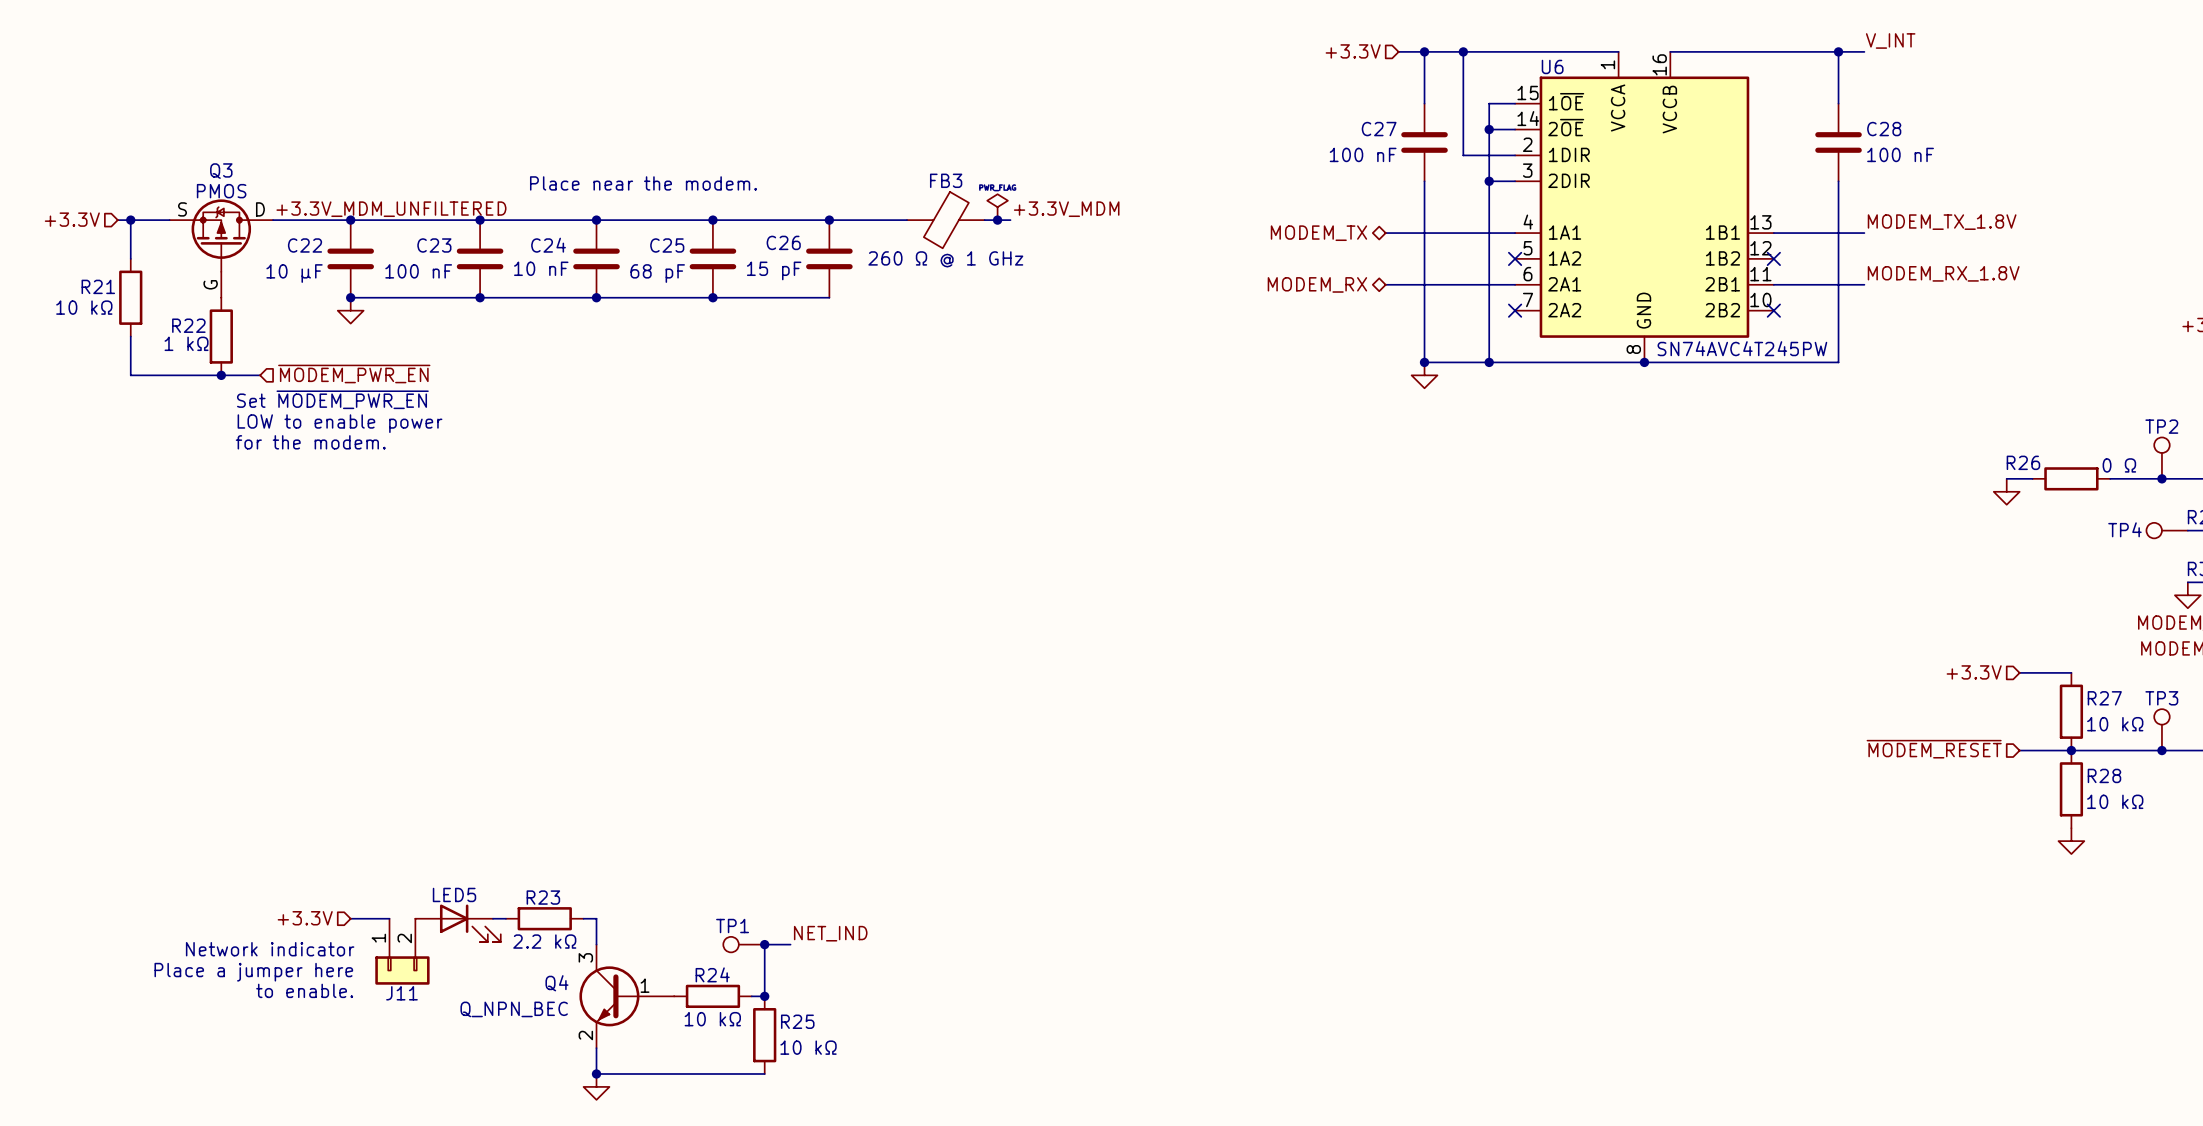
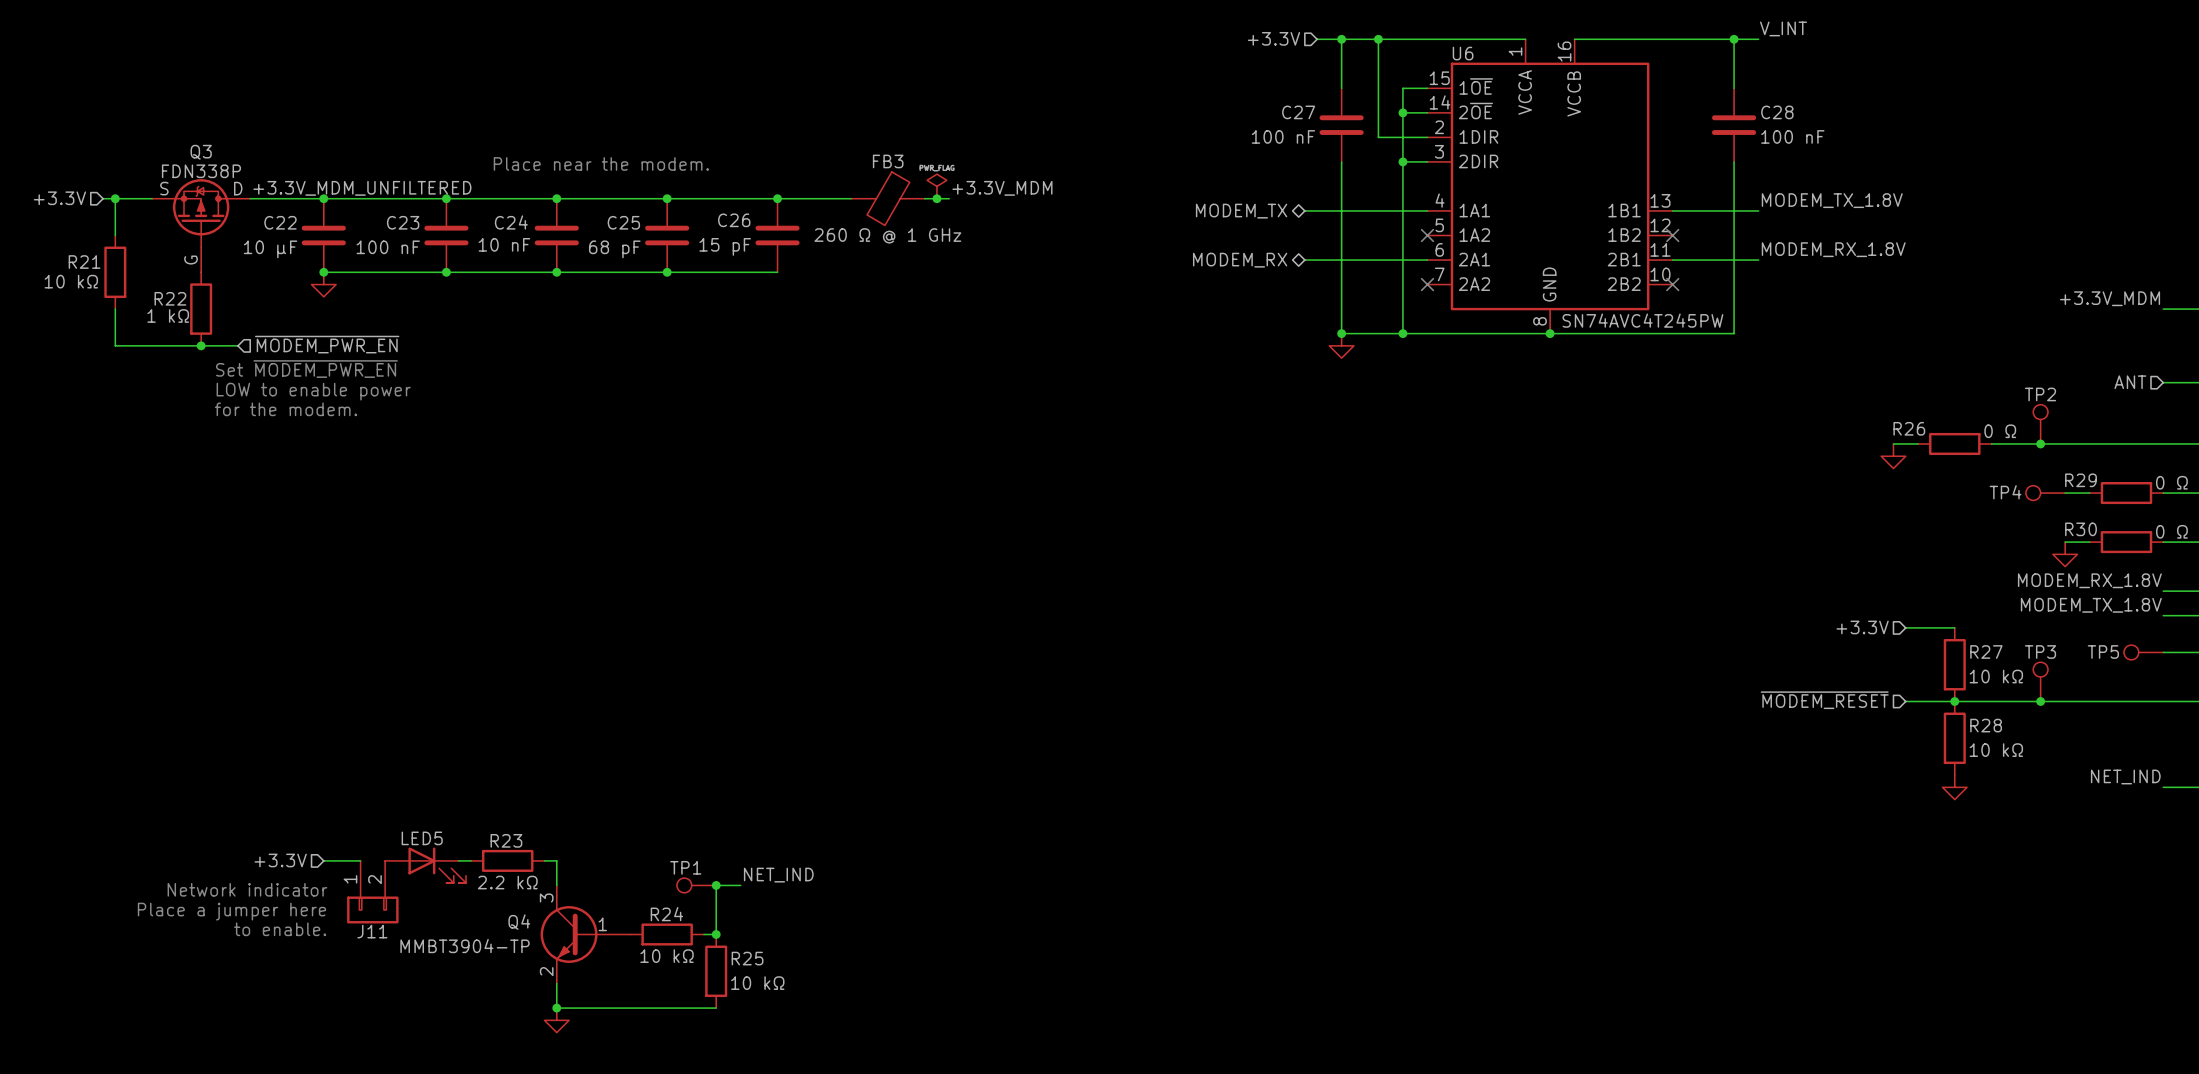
Q3 value: PMOS (221, 191) -> FDN338P (201, 171)
Q4 value: Q_NPN_BEC (514, 1009) -> MMBT3904-TP (465, 946)

